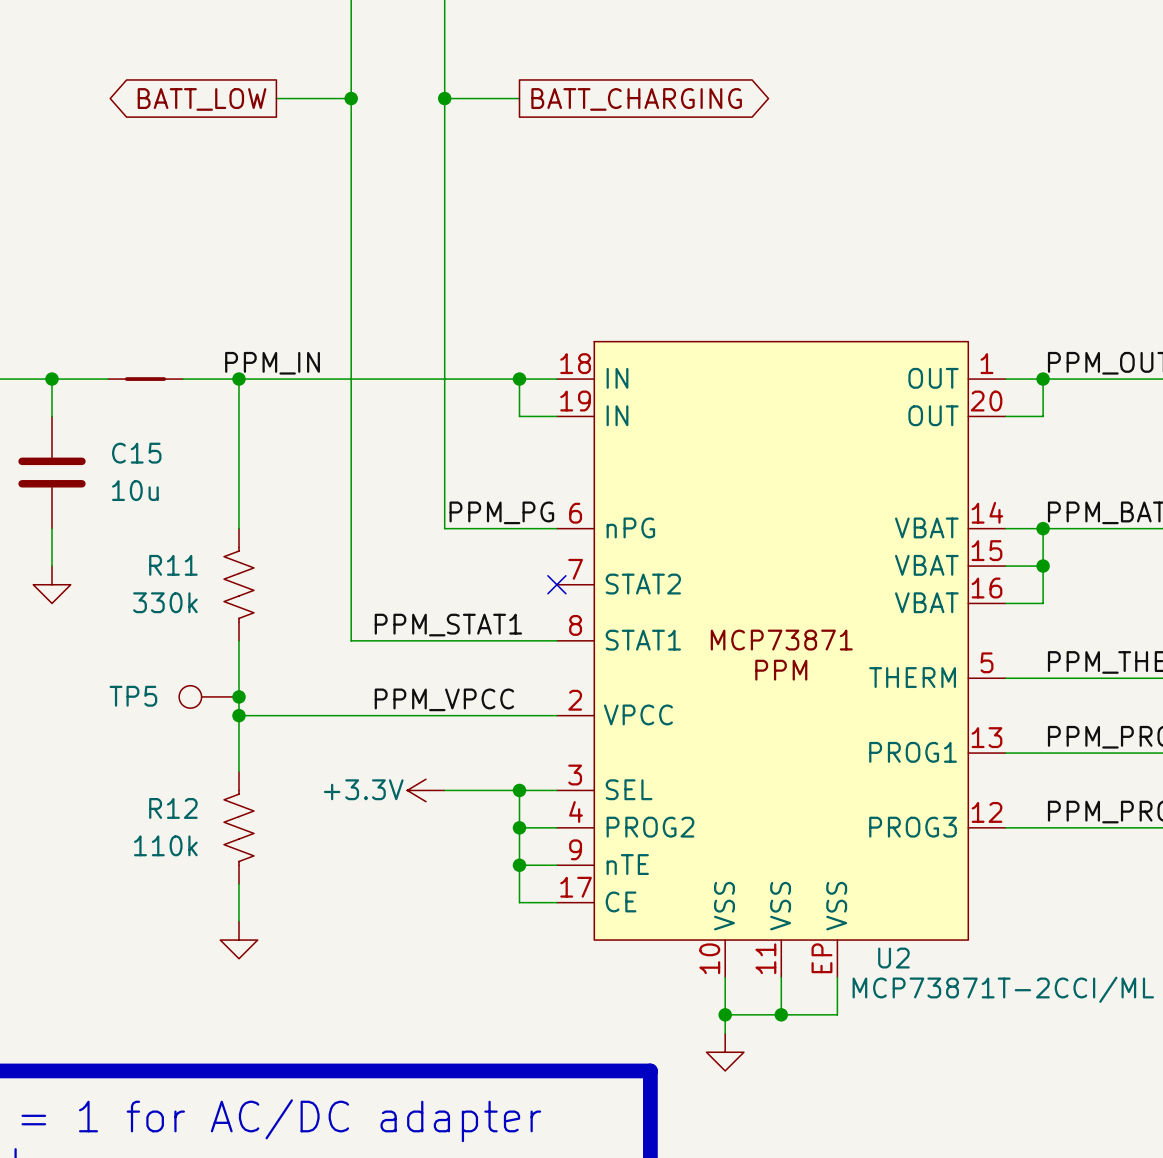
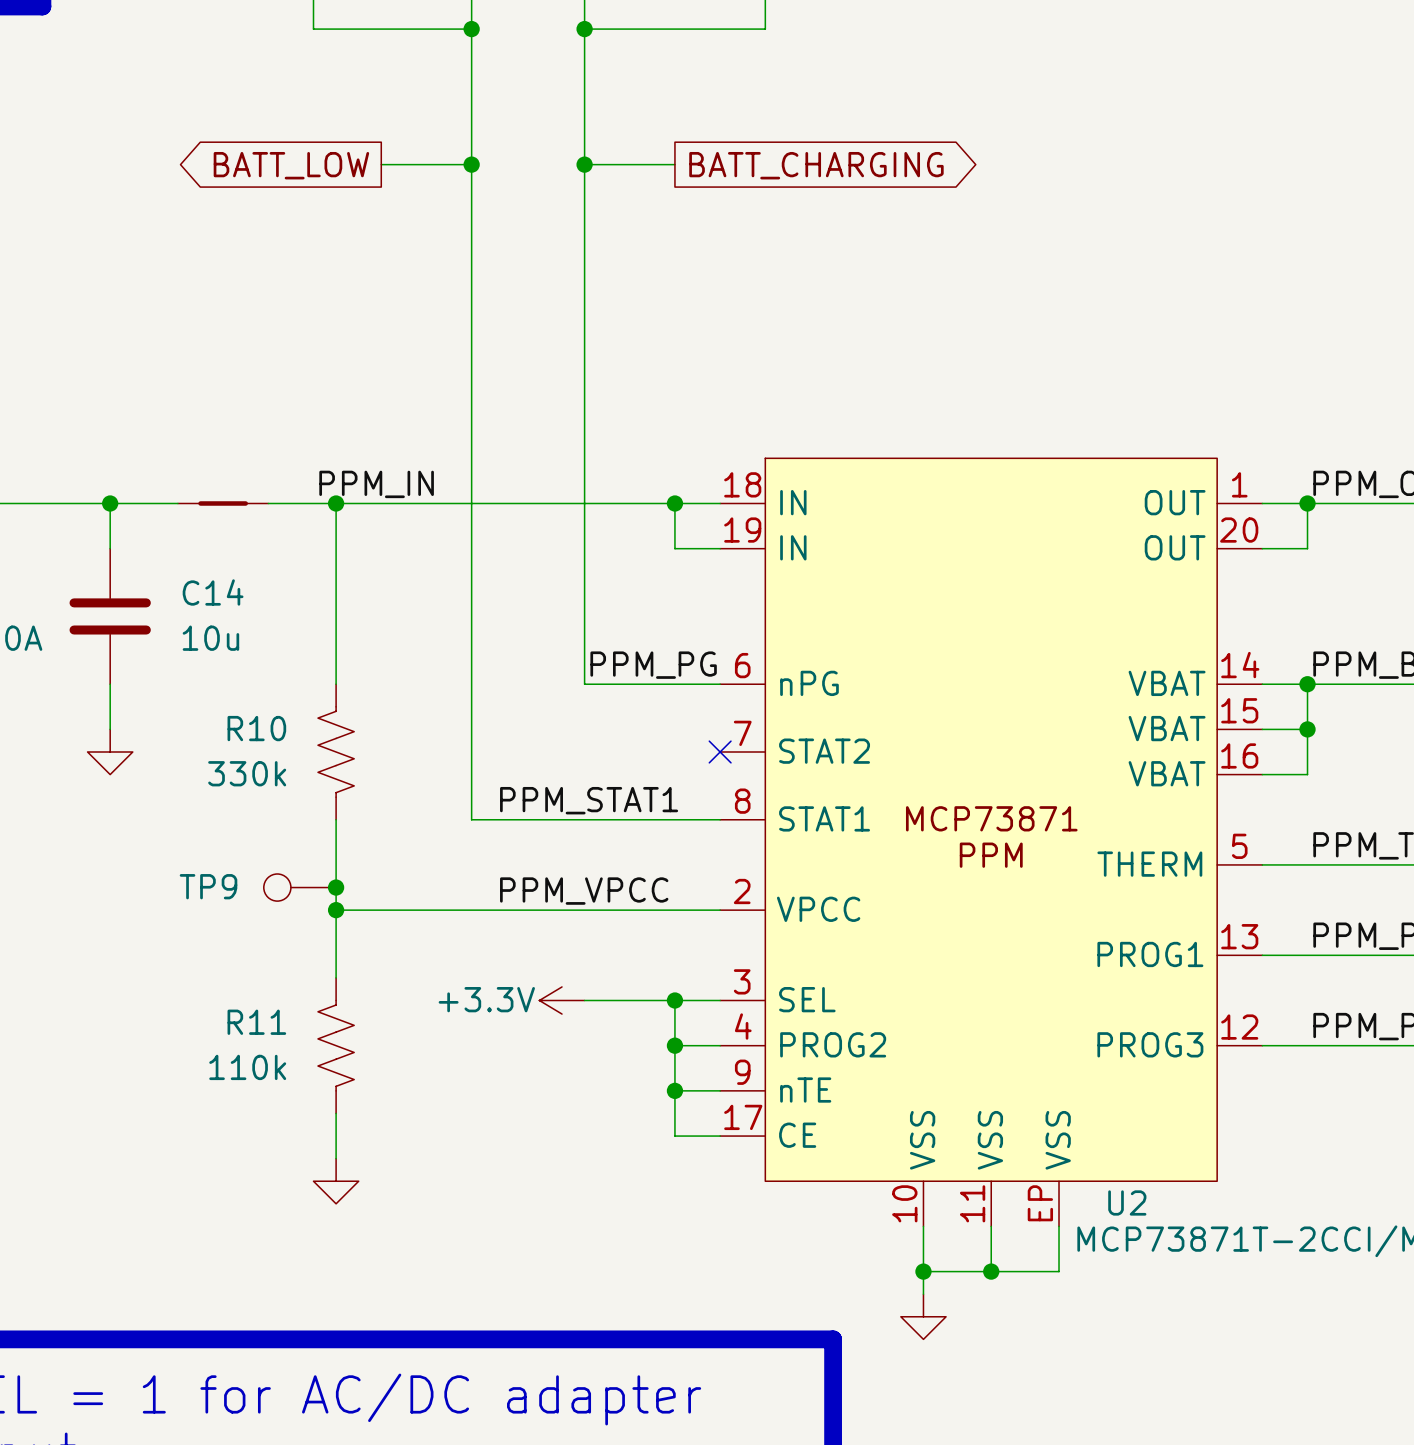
C15 name: C15 (136, 453) -> C14 (213, 592)
R11 name: R11 (173, 565) -> R10 (256, 728)
TP5 name: TP5 (133, 696) -> TP9 (208, 886)
R12 name: R12 (173, 808) -> R11 (256, 1022)

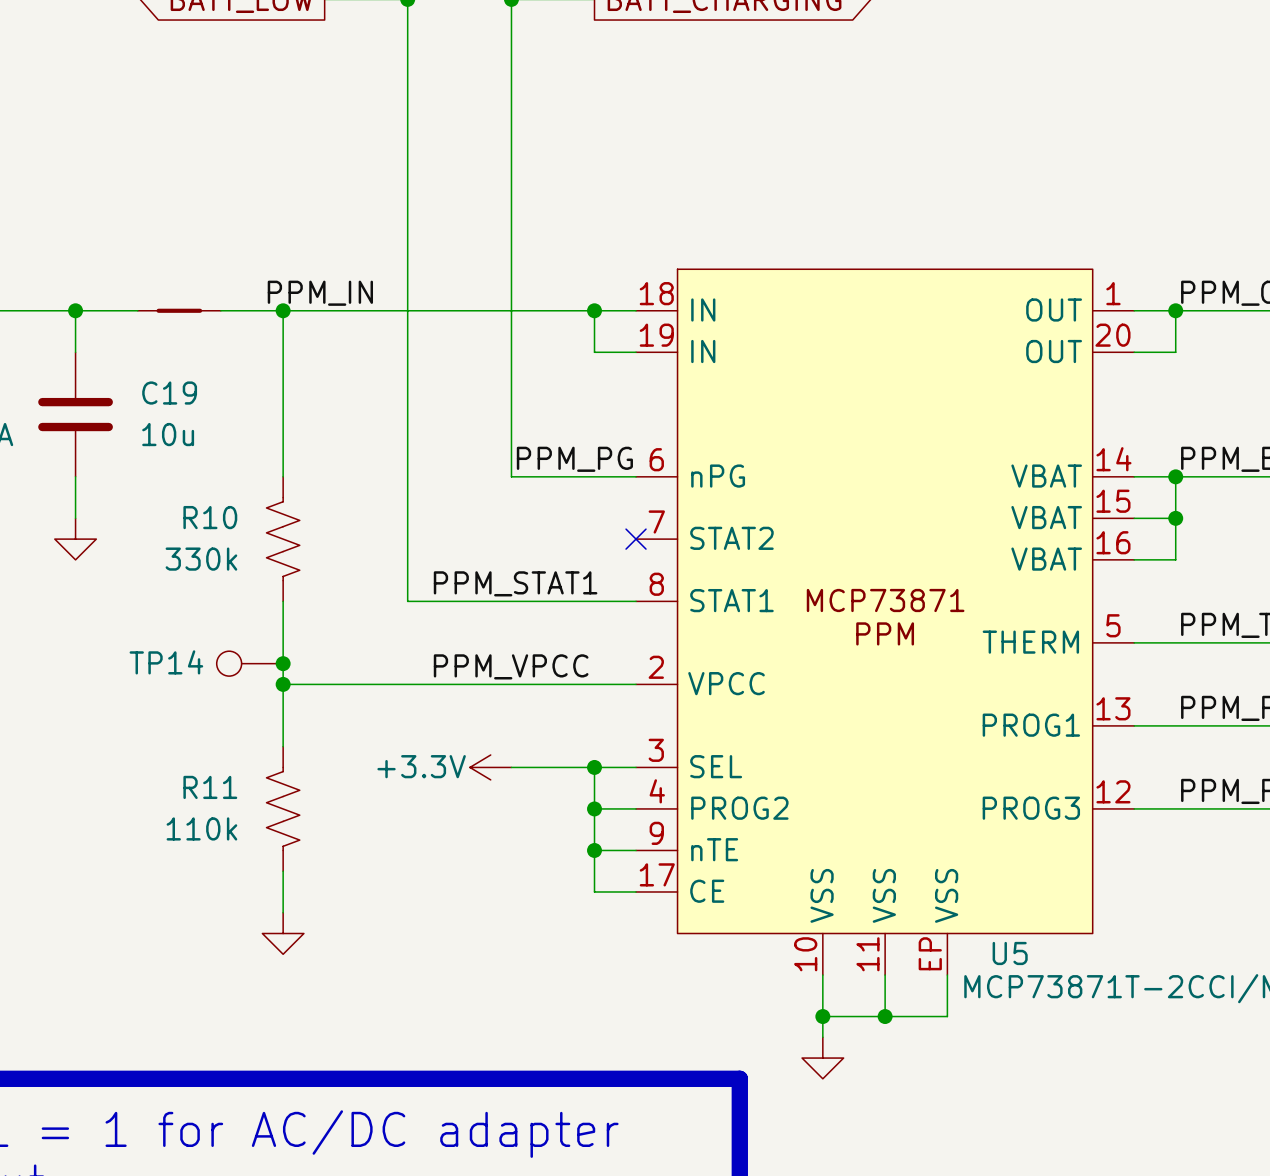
C14 name: C14 (213, 592) -> C19 (169, 393)
TP9 name: TP9 (208, 886) -> TP14 (166, 662)
U2 name: U2 (1127, 1202) -> U5 (1010, 953)

